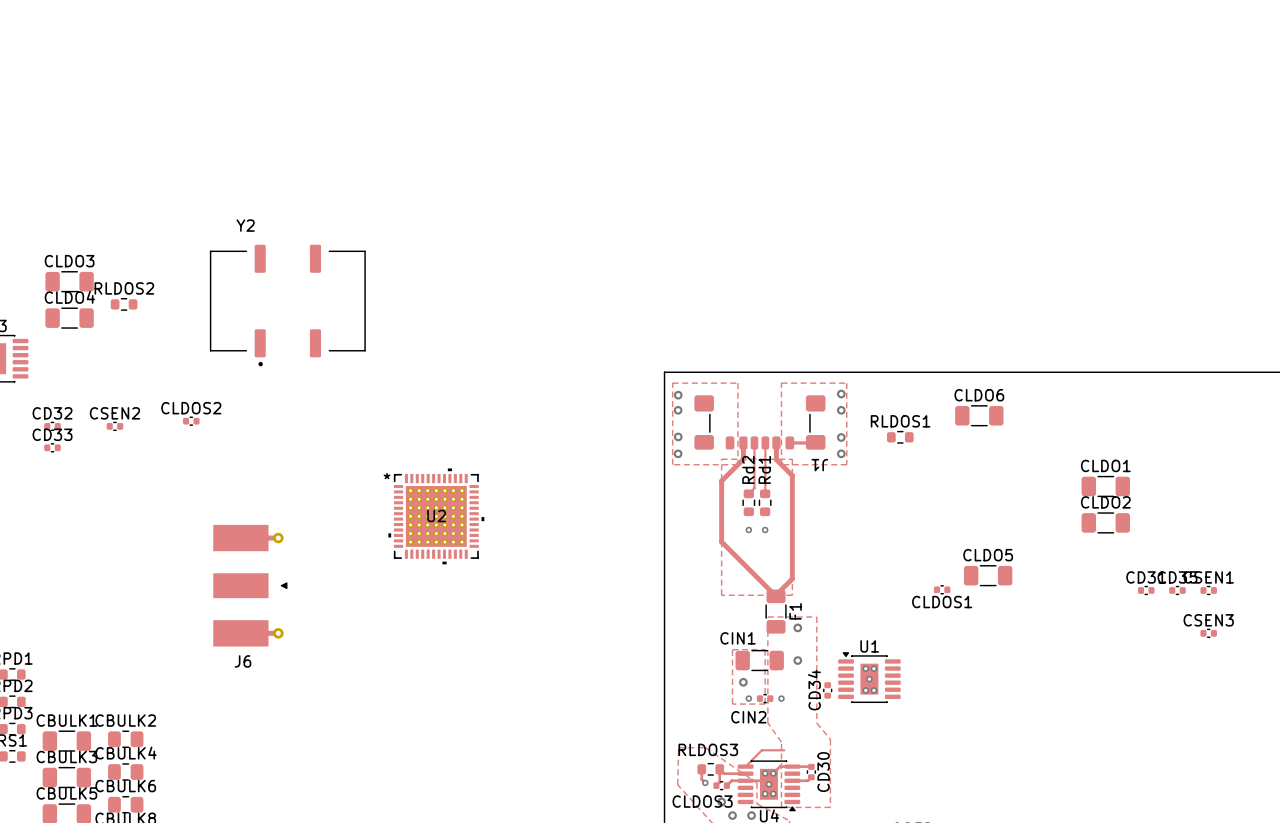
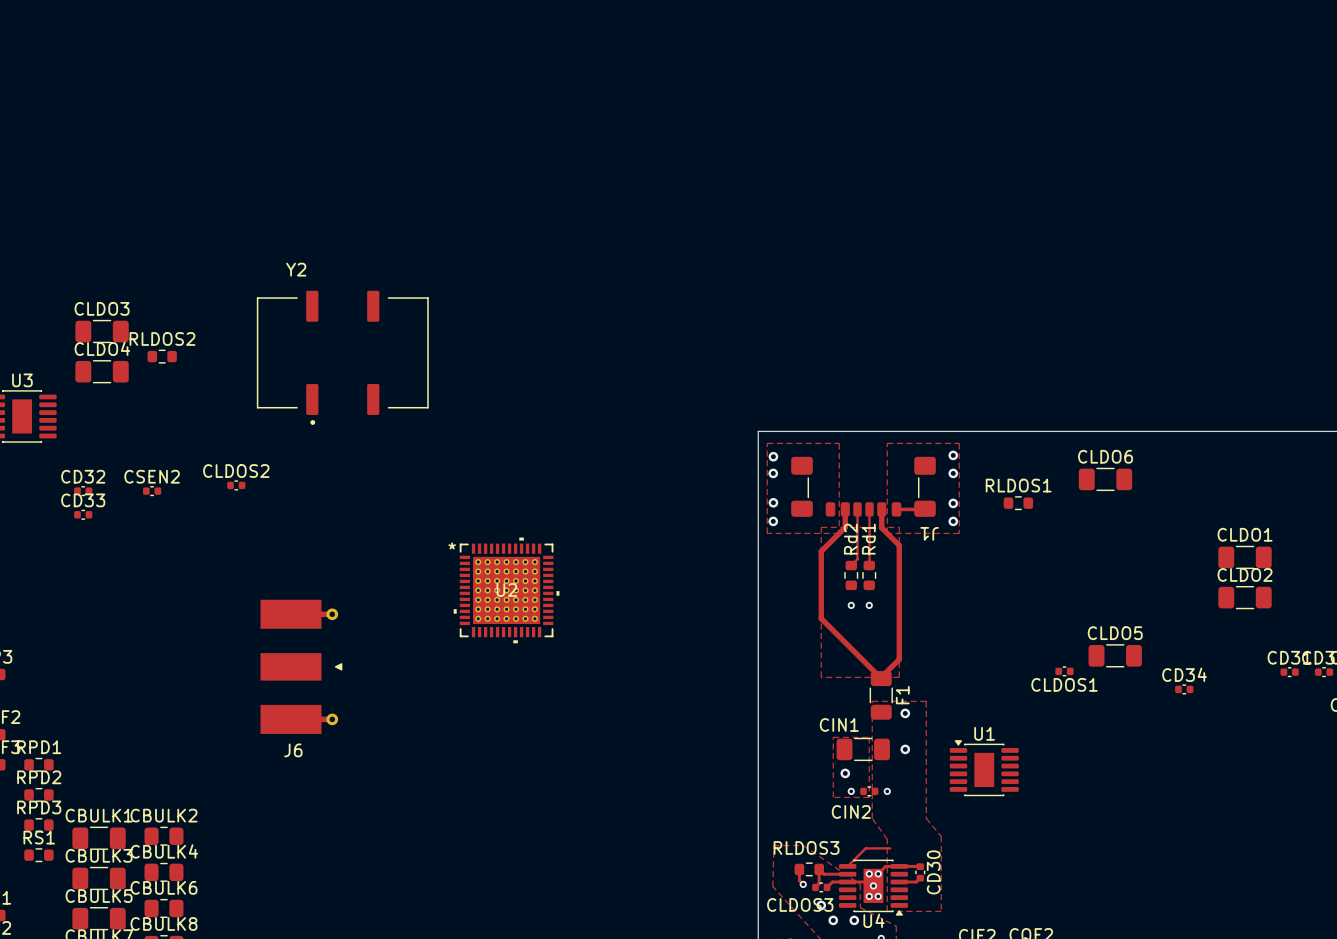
via: (865, 668) -> none
via: (873, 668) -> none
via: (869, 679) -> none
CD34 rotation: 0° (827, 690) -> 90° clockwise (1184, 689)
CD34 position: (827, 690) -> (1184, 689)
via: (865, 690) -> none
via: (873, 690) -> none

